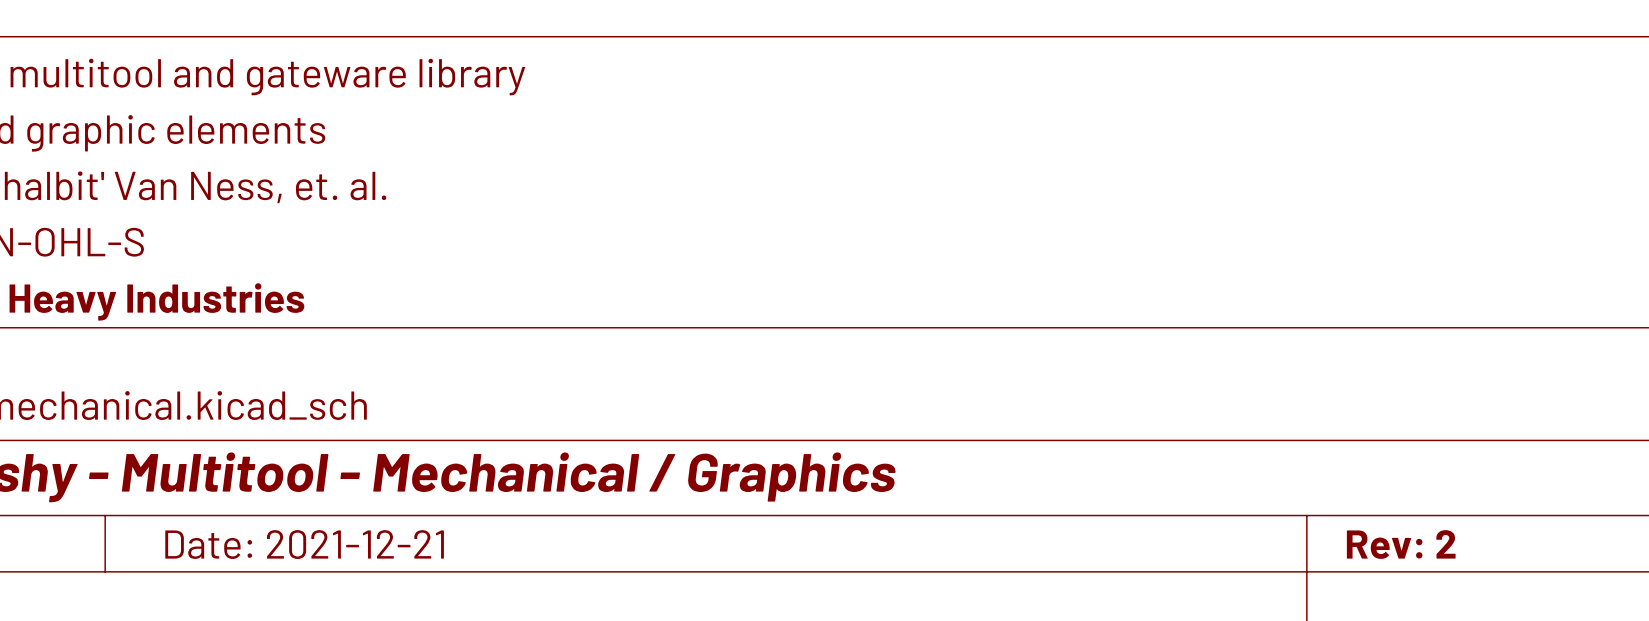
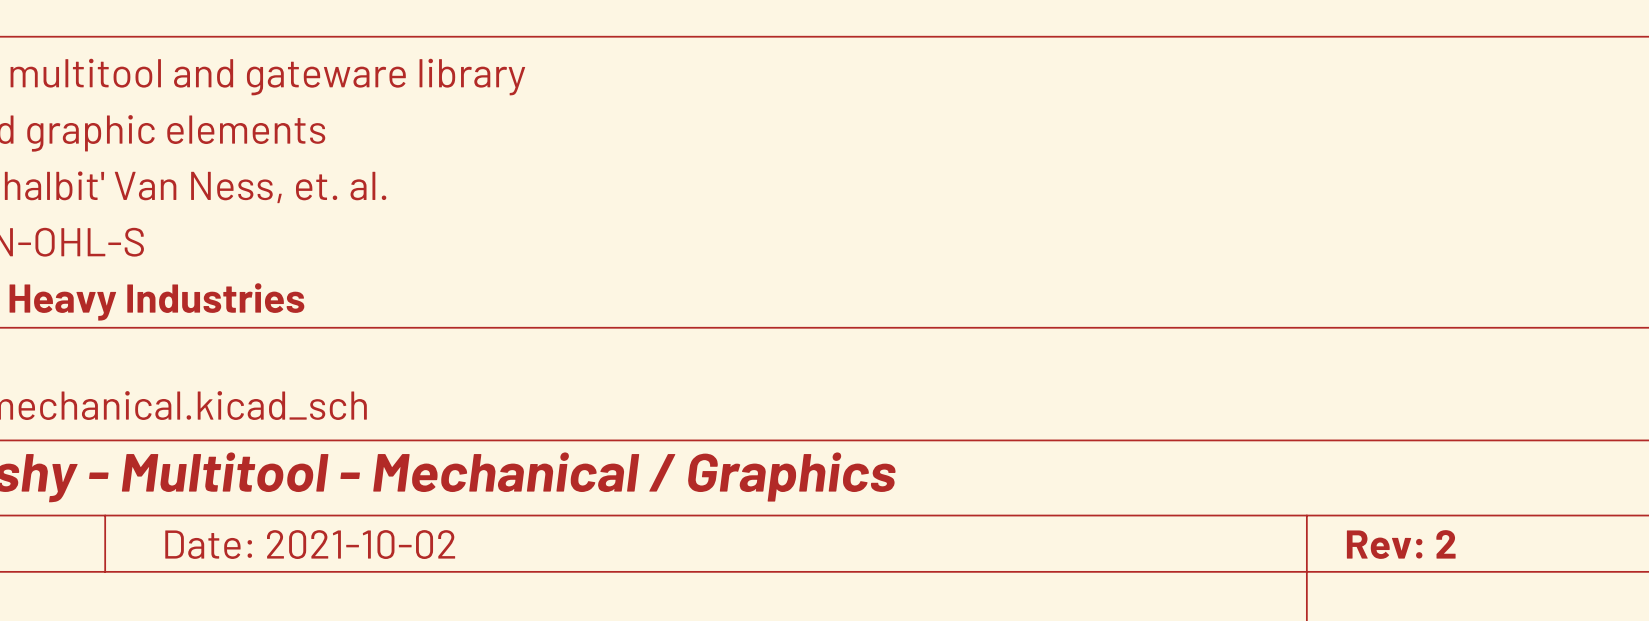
title block: Date: 2021-12-21 (304, 544) -> Date: 2021-10-02 (310, 544)

